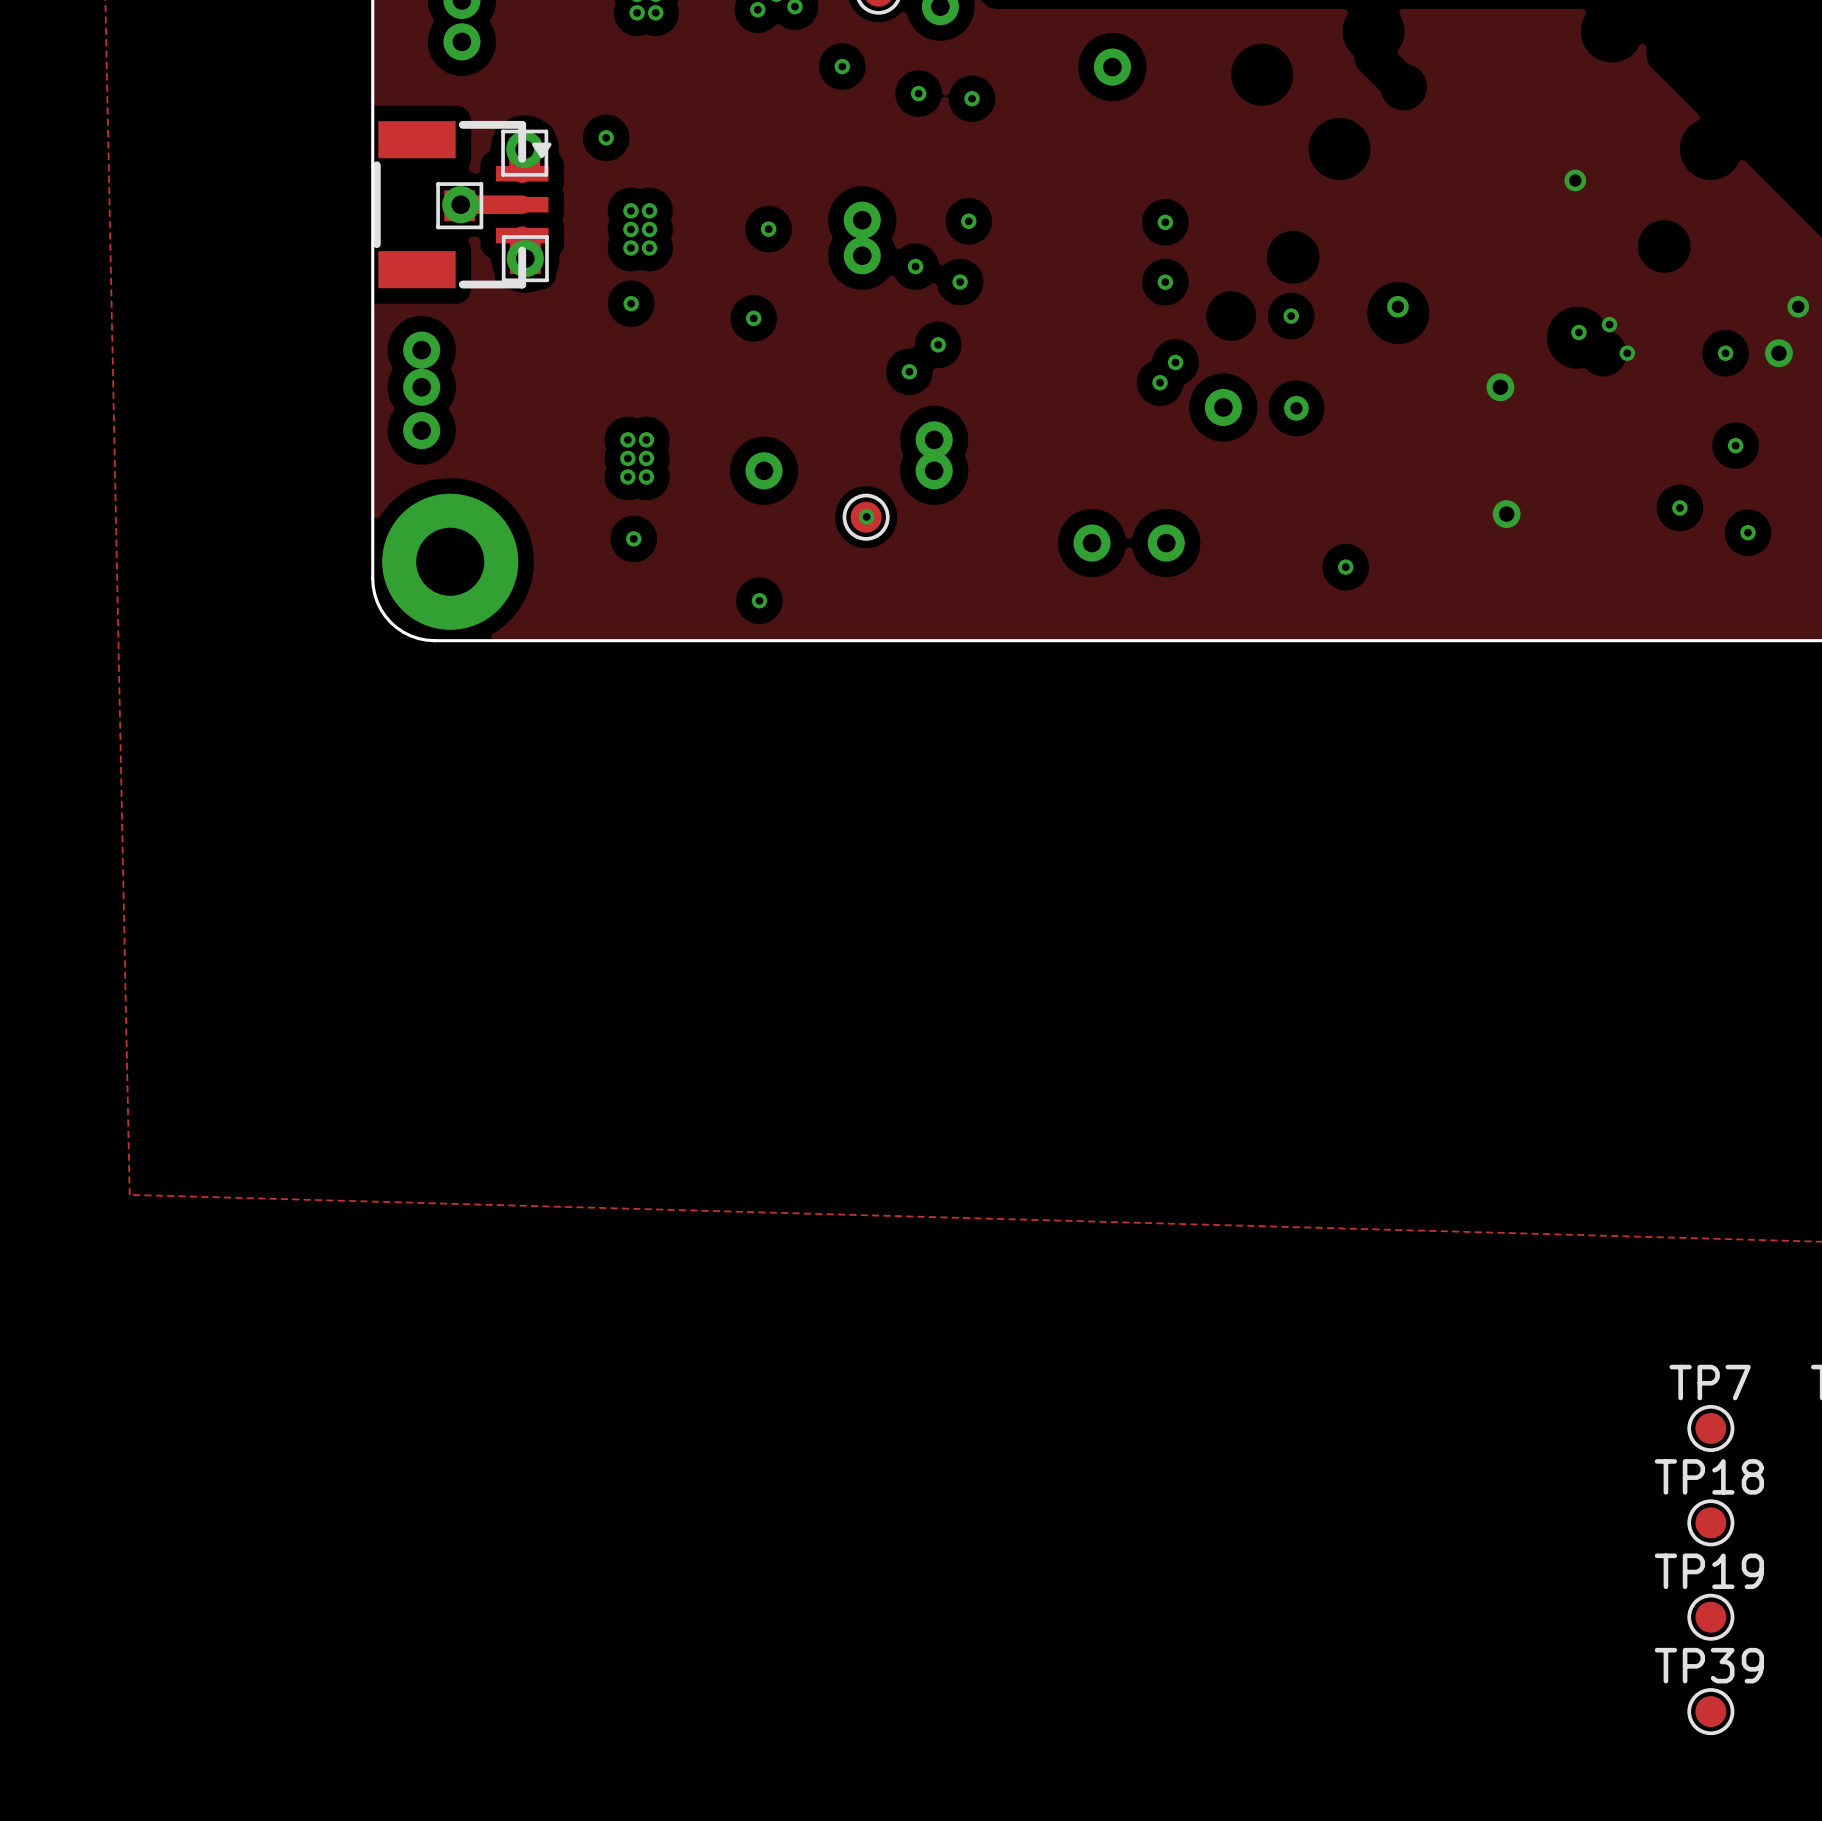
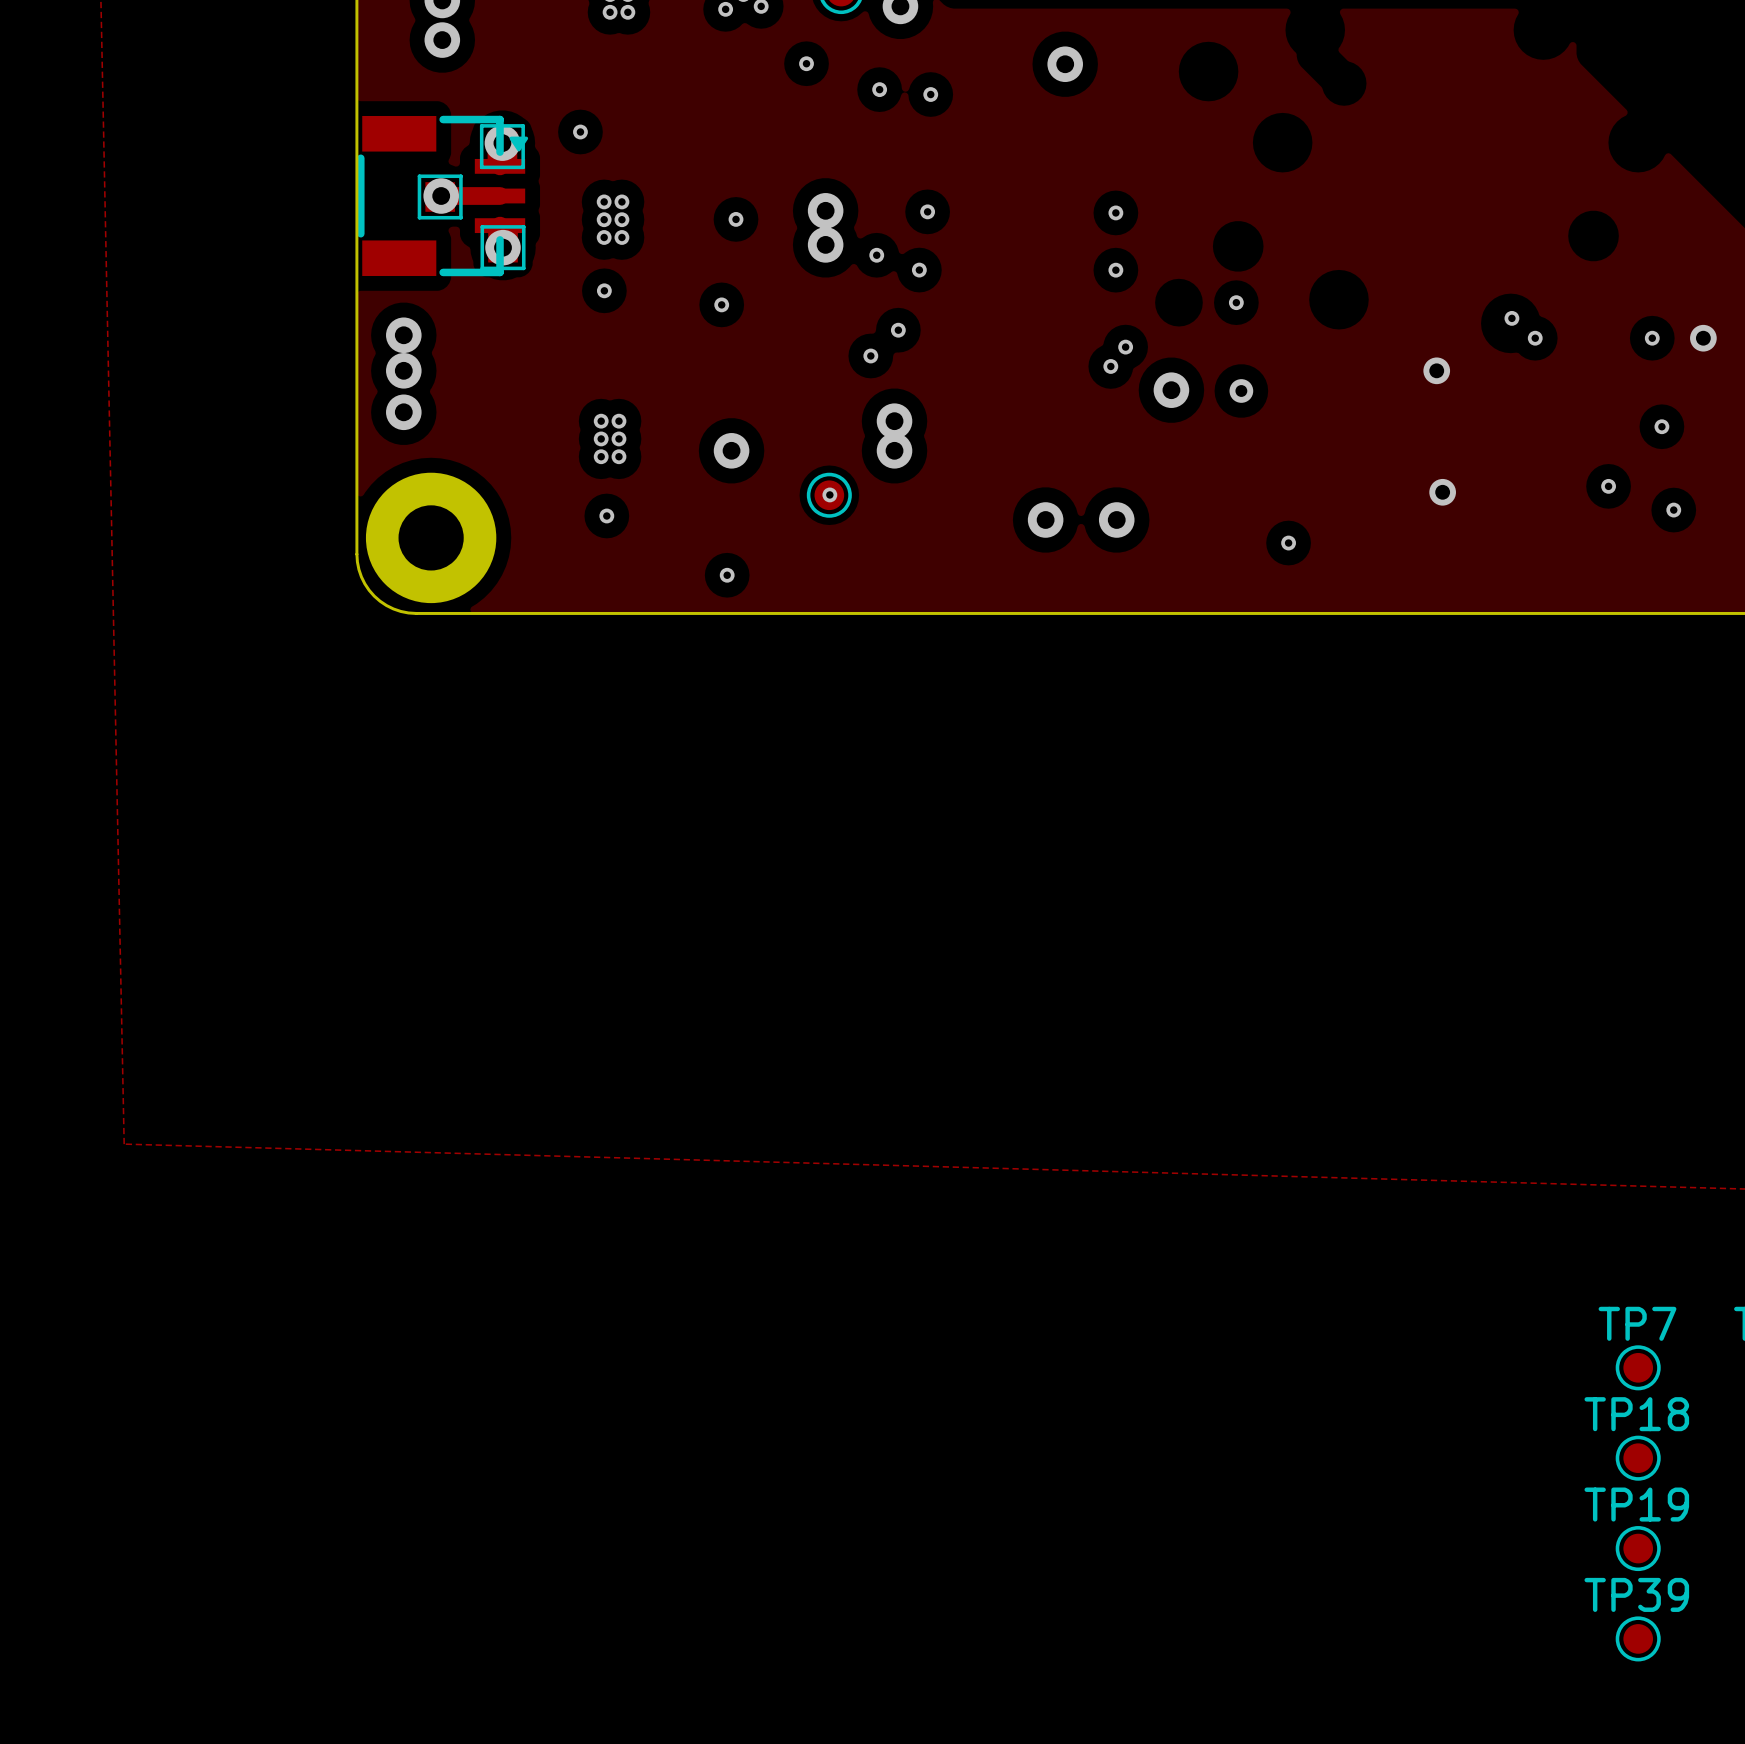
via: (1575, 180) -> none
via: (1397, 306) -> none
via: (1798, 306) -> none
via: (1609, 324) -> none
via: none -> (1535, 338)
via: (1627, 353) -> none

